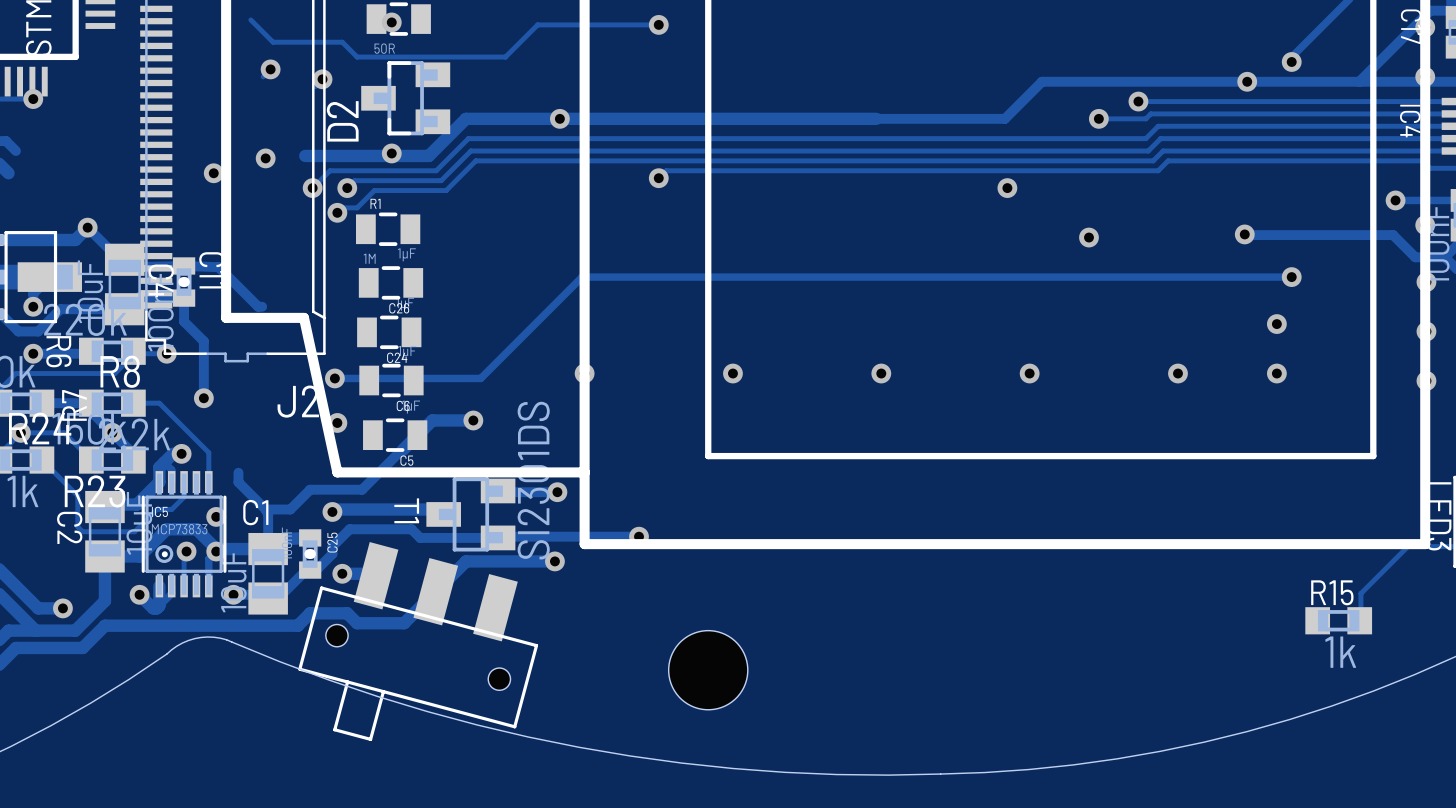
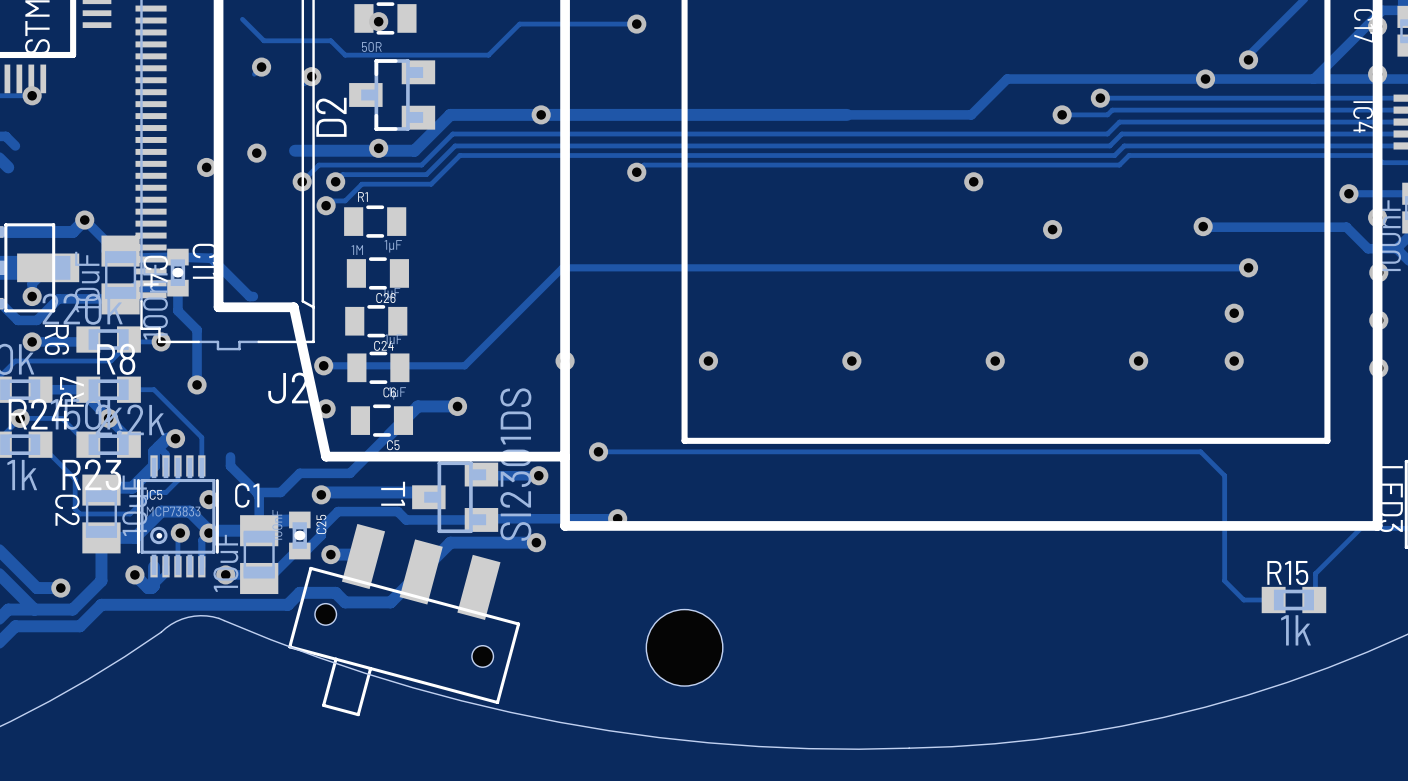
track: none -> (598, 451) (1200, 451) (1224, 475) (1224, 580) (1243, 600) (1273, 600)
via: none -> (598, 451)

